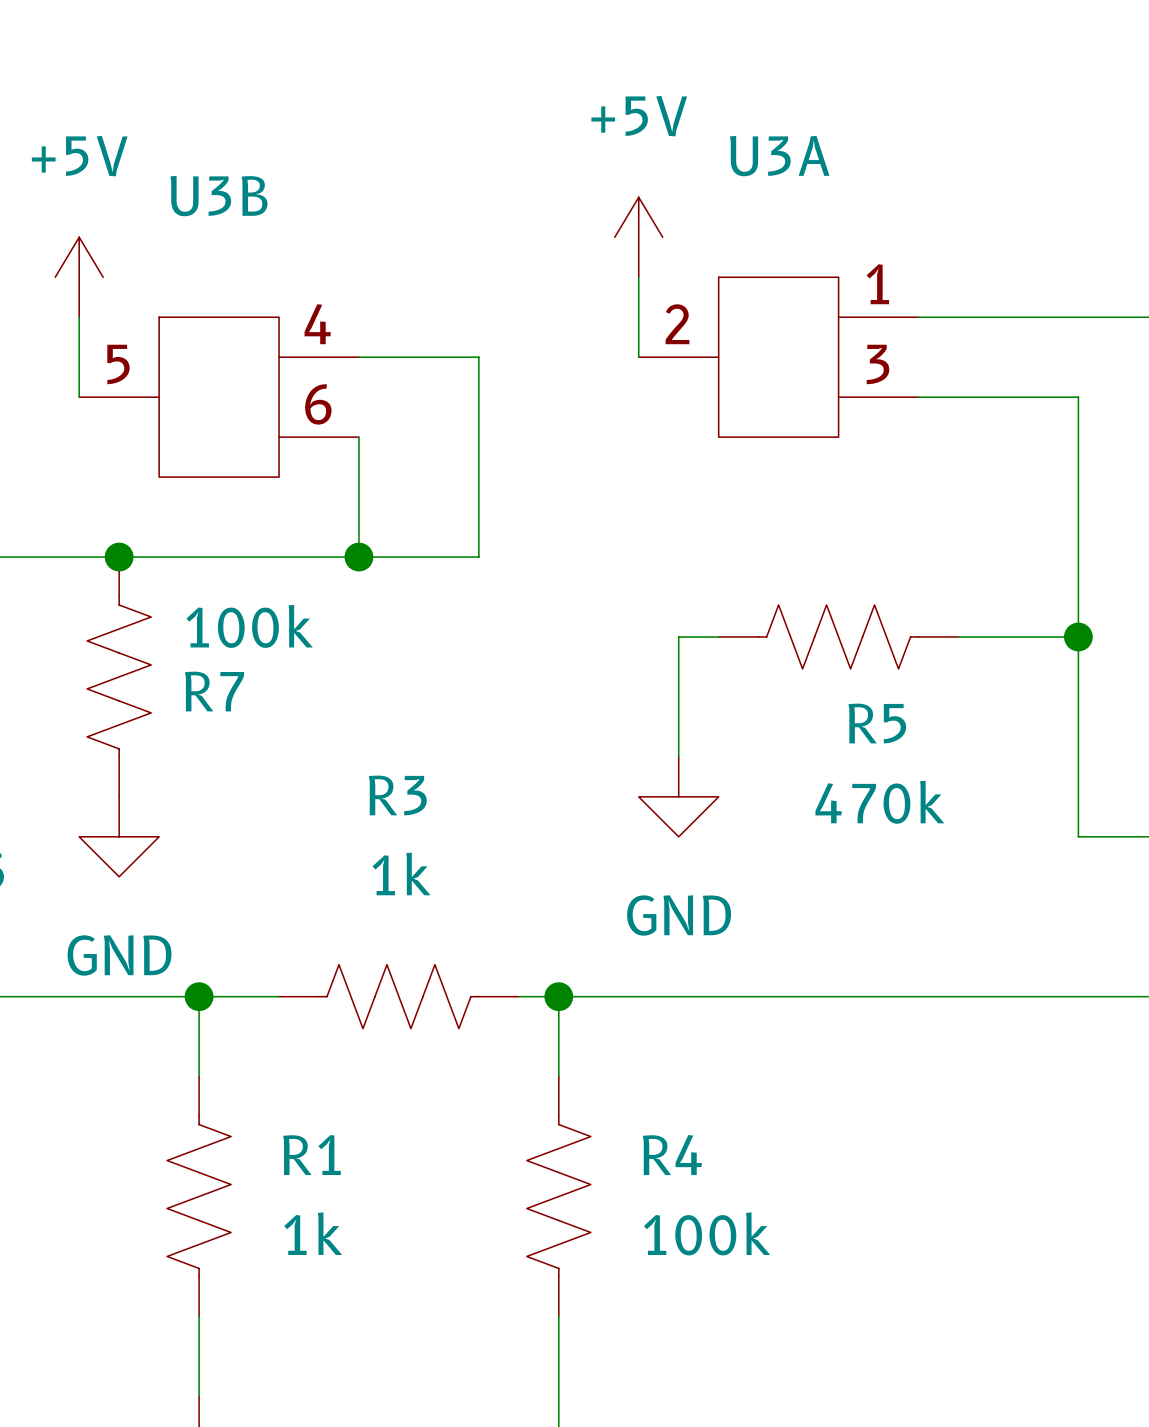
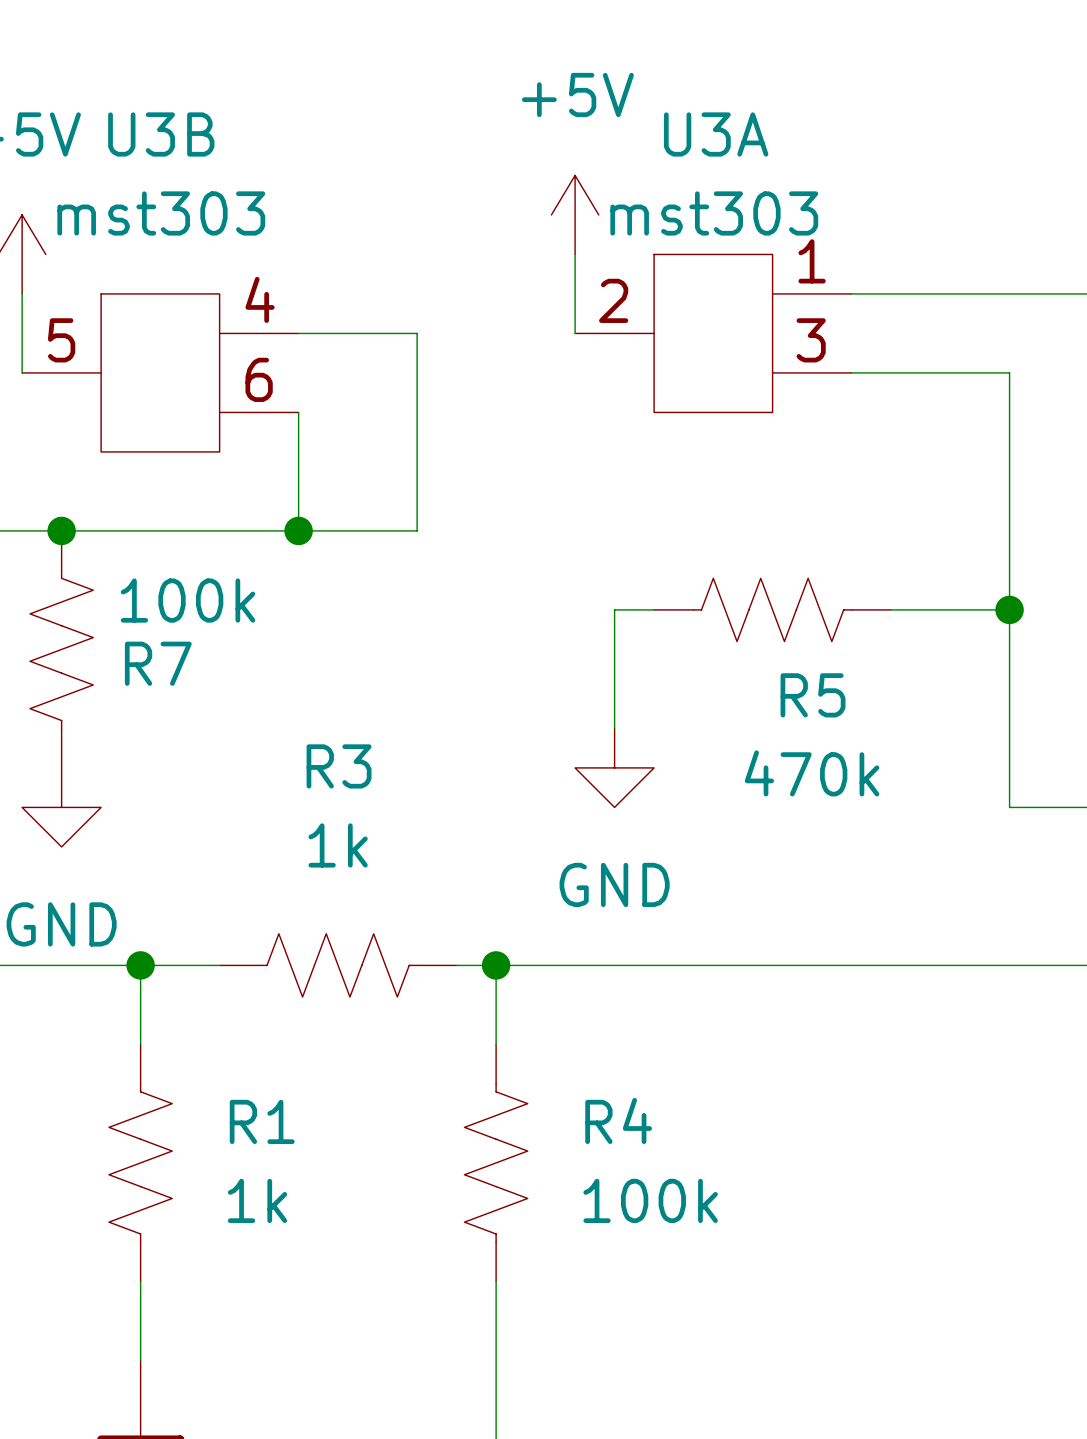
U3B name position: U3B (218, 196) -> U3B (161, 134)
U3B value: none -> mst303 (161, 213)
U3A value: none -> mst303 (714, 213)

